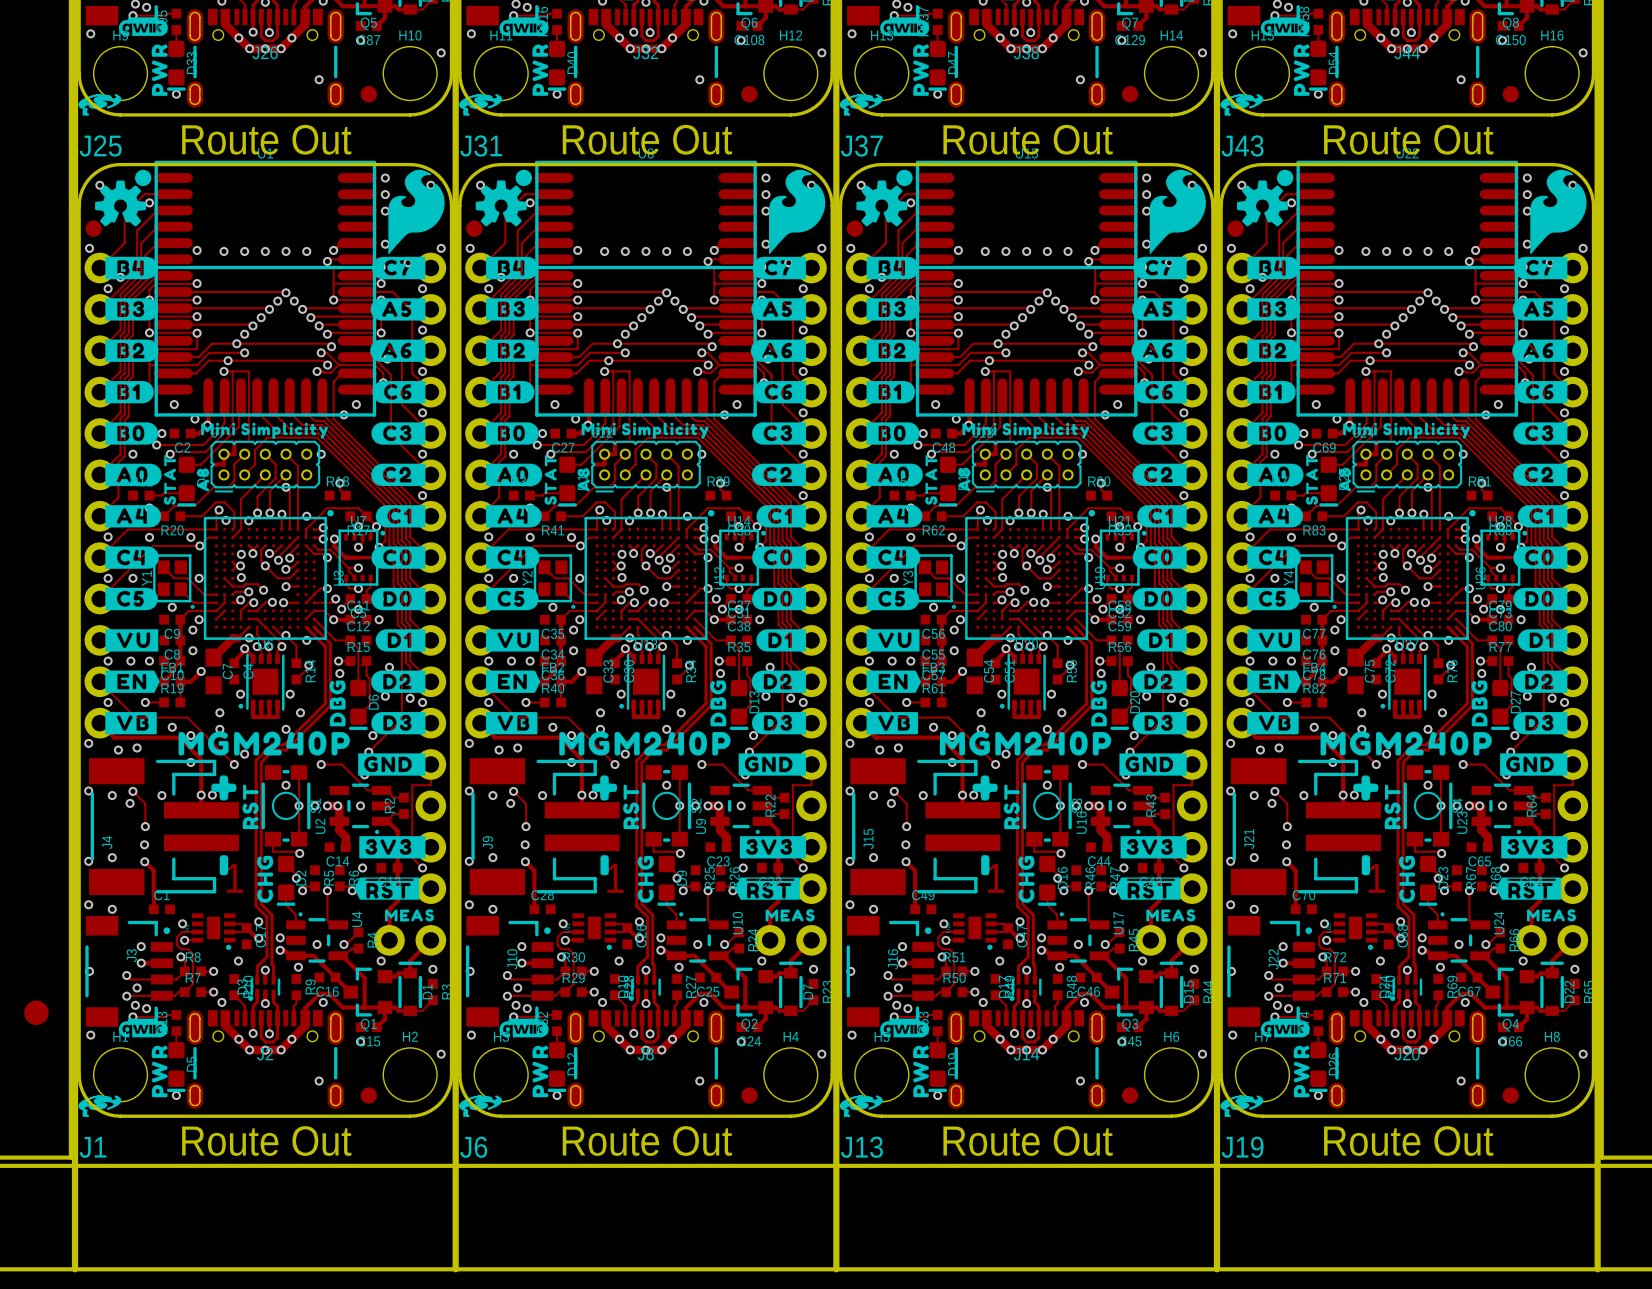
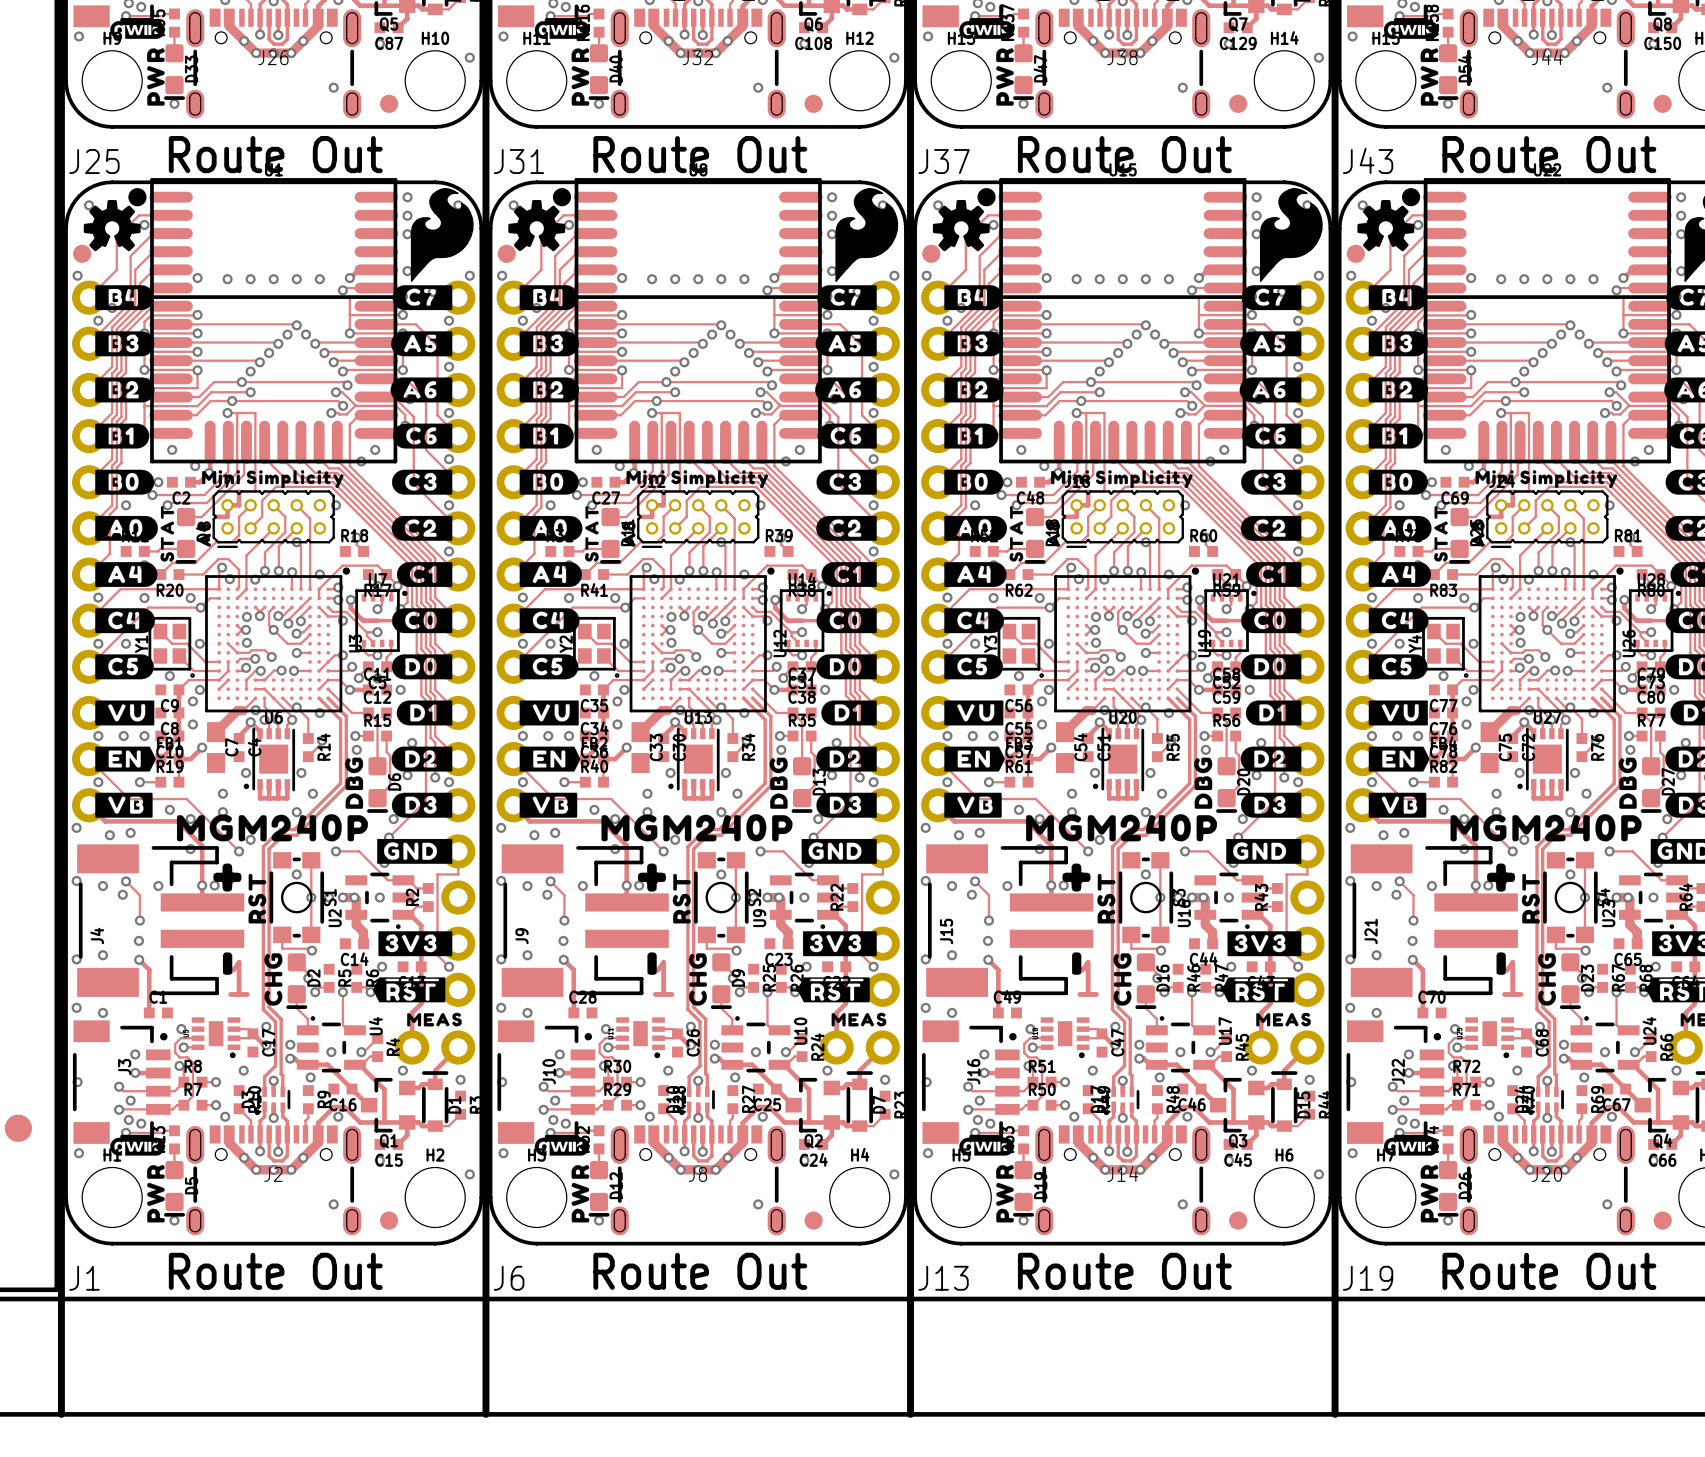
drawing: [78, 93, 122, 116] -> none
drawing: [459, 93, 503, 116] -> none
drawing: [839, 93, 883, 116] -> none
drawing: [1220, 93, 1264, 116] -> none
drawing: [78, 1095, 122, 1118] -> none
drawing: [459, 1095, 503, 1118] -> none
drawing: [839, 1095, 883, 1118] -> none
drawing: [1220, 1095, 1264, 1118] -> none

